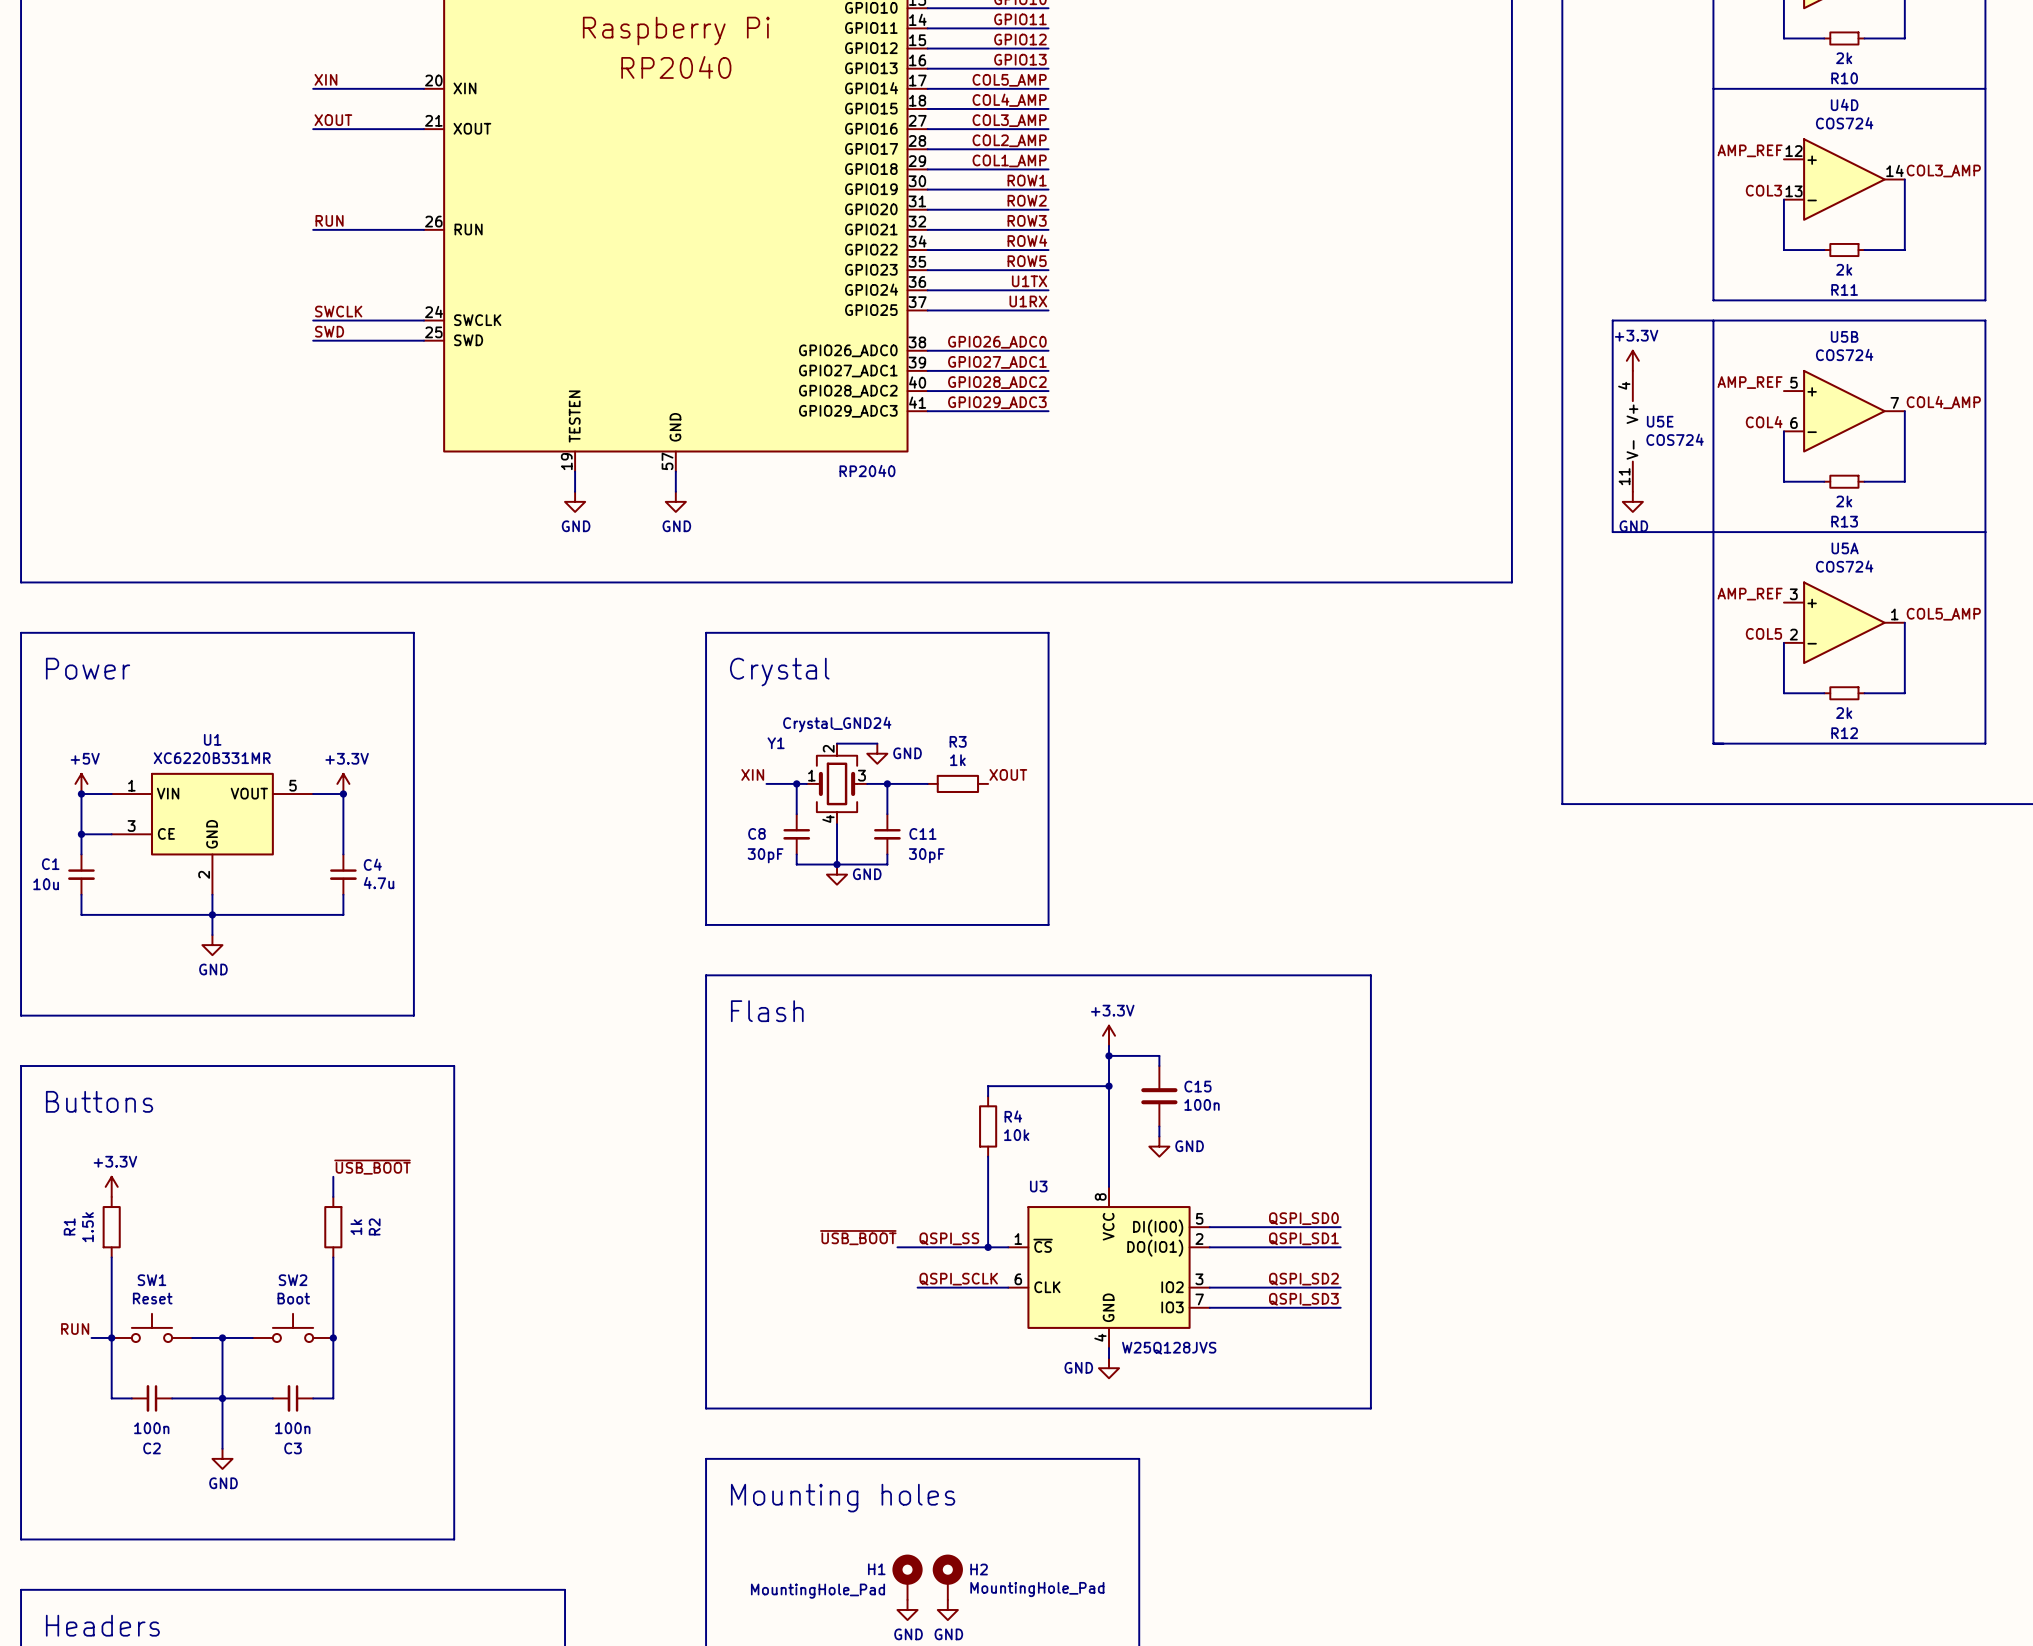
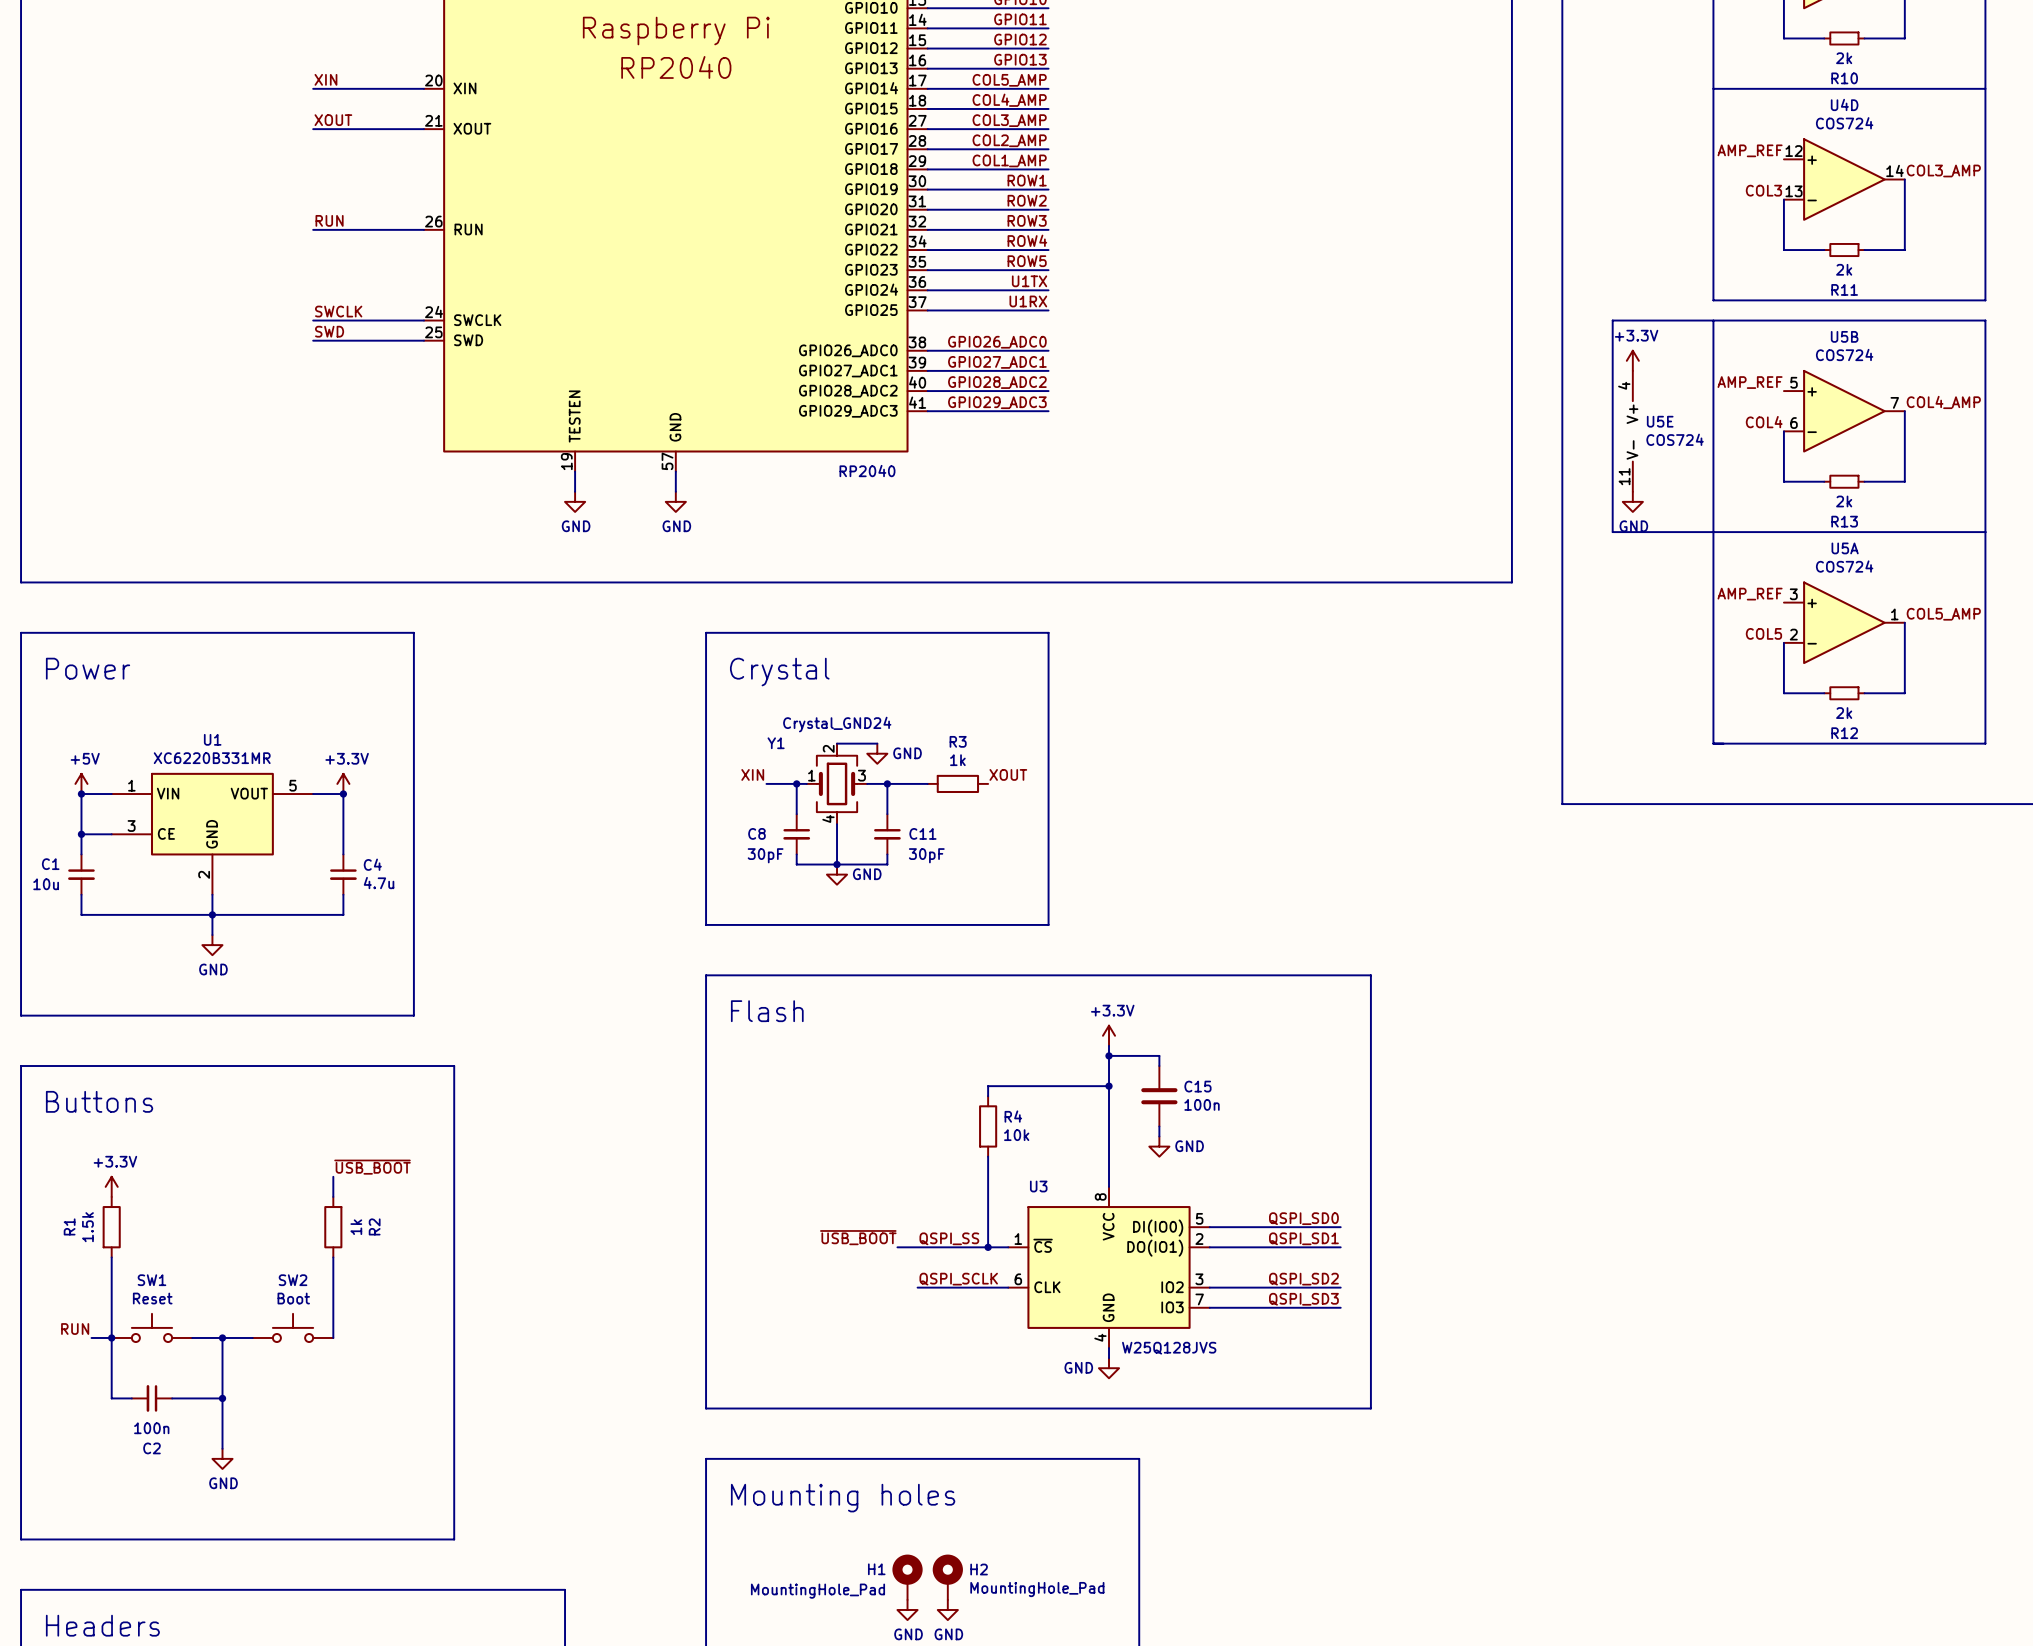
wire: (333, 1337) (333, 1398) (313, 1398) -> none
junction: (333, 1337) -> none
wire: (222, 1398) (272, 1398) -> none
C3: 100n (293, 1398) -> none

